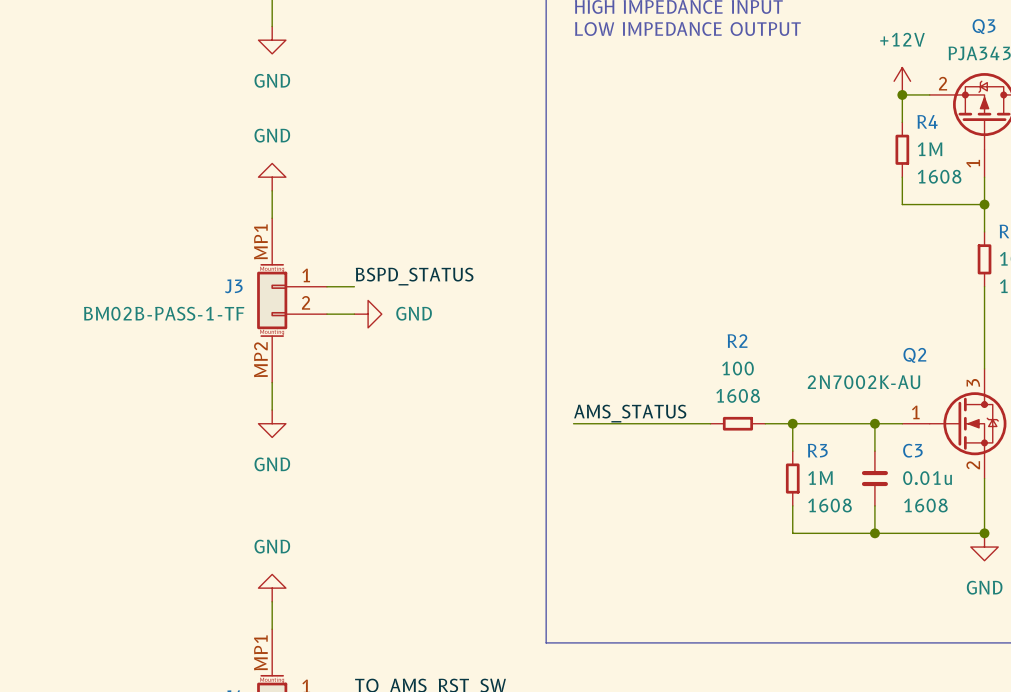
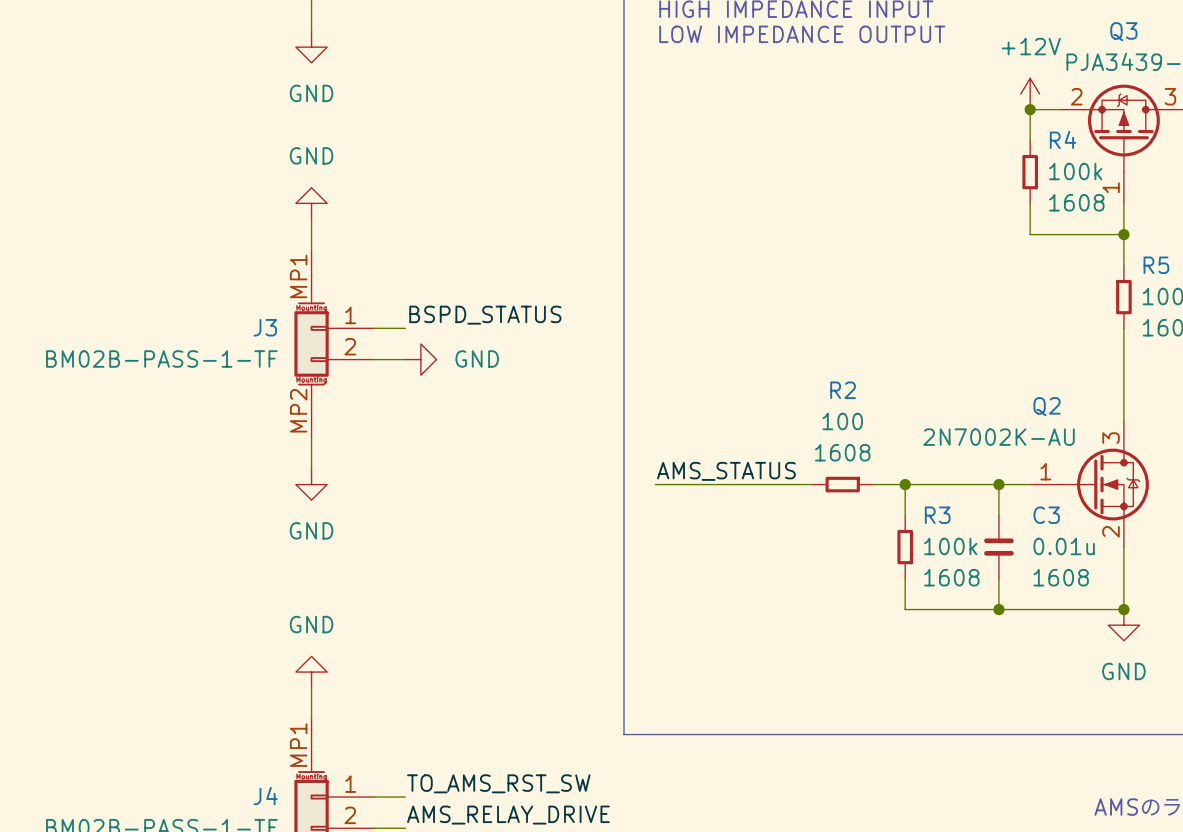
R4 value: 1M (930, 149) -> 100k (1075, 171)
R3 value: 1M (820, 478) -> 100k (950, 546)

